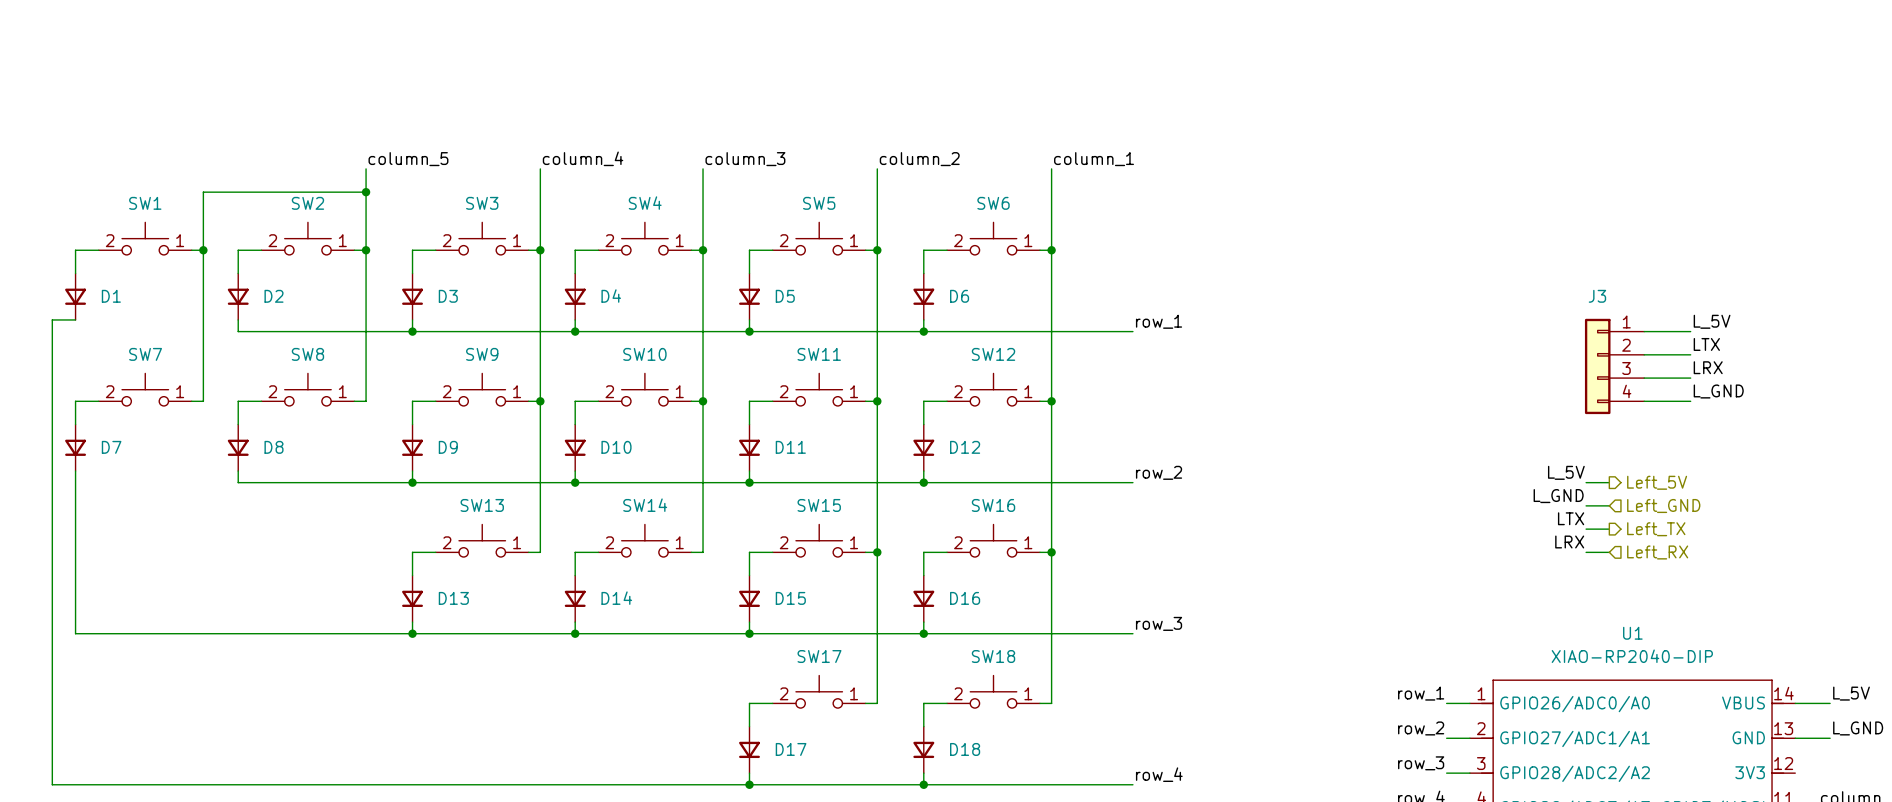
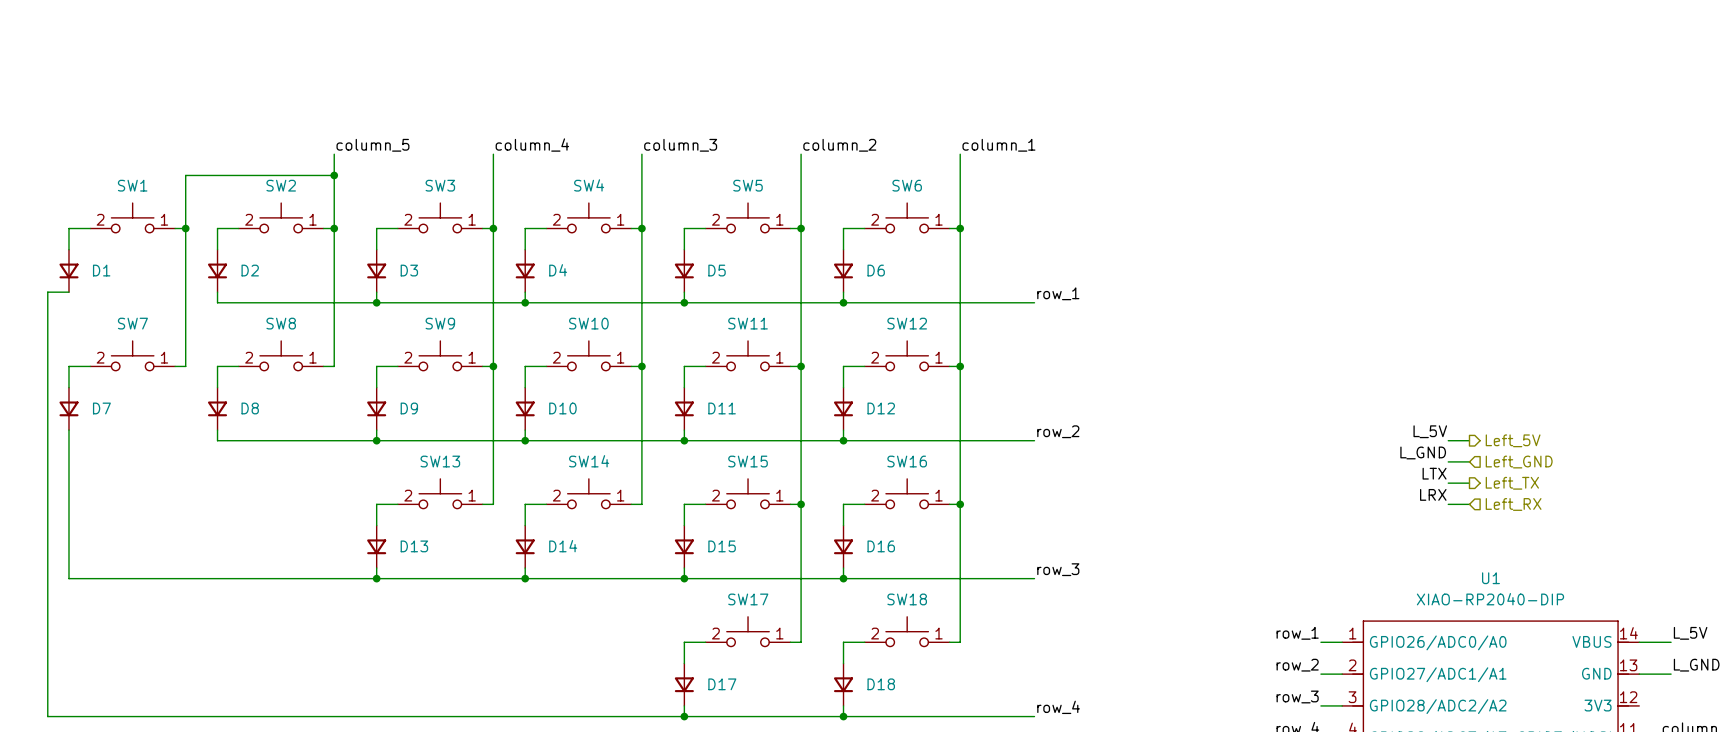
label: L_5V (1712, 321) -> none
wire: (1644, 331) (1690, 331) -> none
label: LTX (1706, 344) -> none
wire: (1644, 354) (1690, 354) -> none
J3: (1614, 366) -> none
label: LRX (1708, 367) -> none
wire: (1644, 378) (1690, 378) -> none
label: L_GND (1718, 391) -> none
wire: (1644, 401) (1690, 401) -> none

